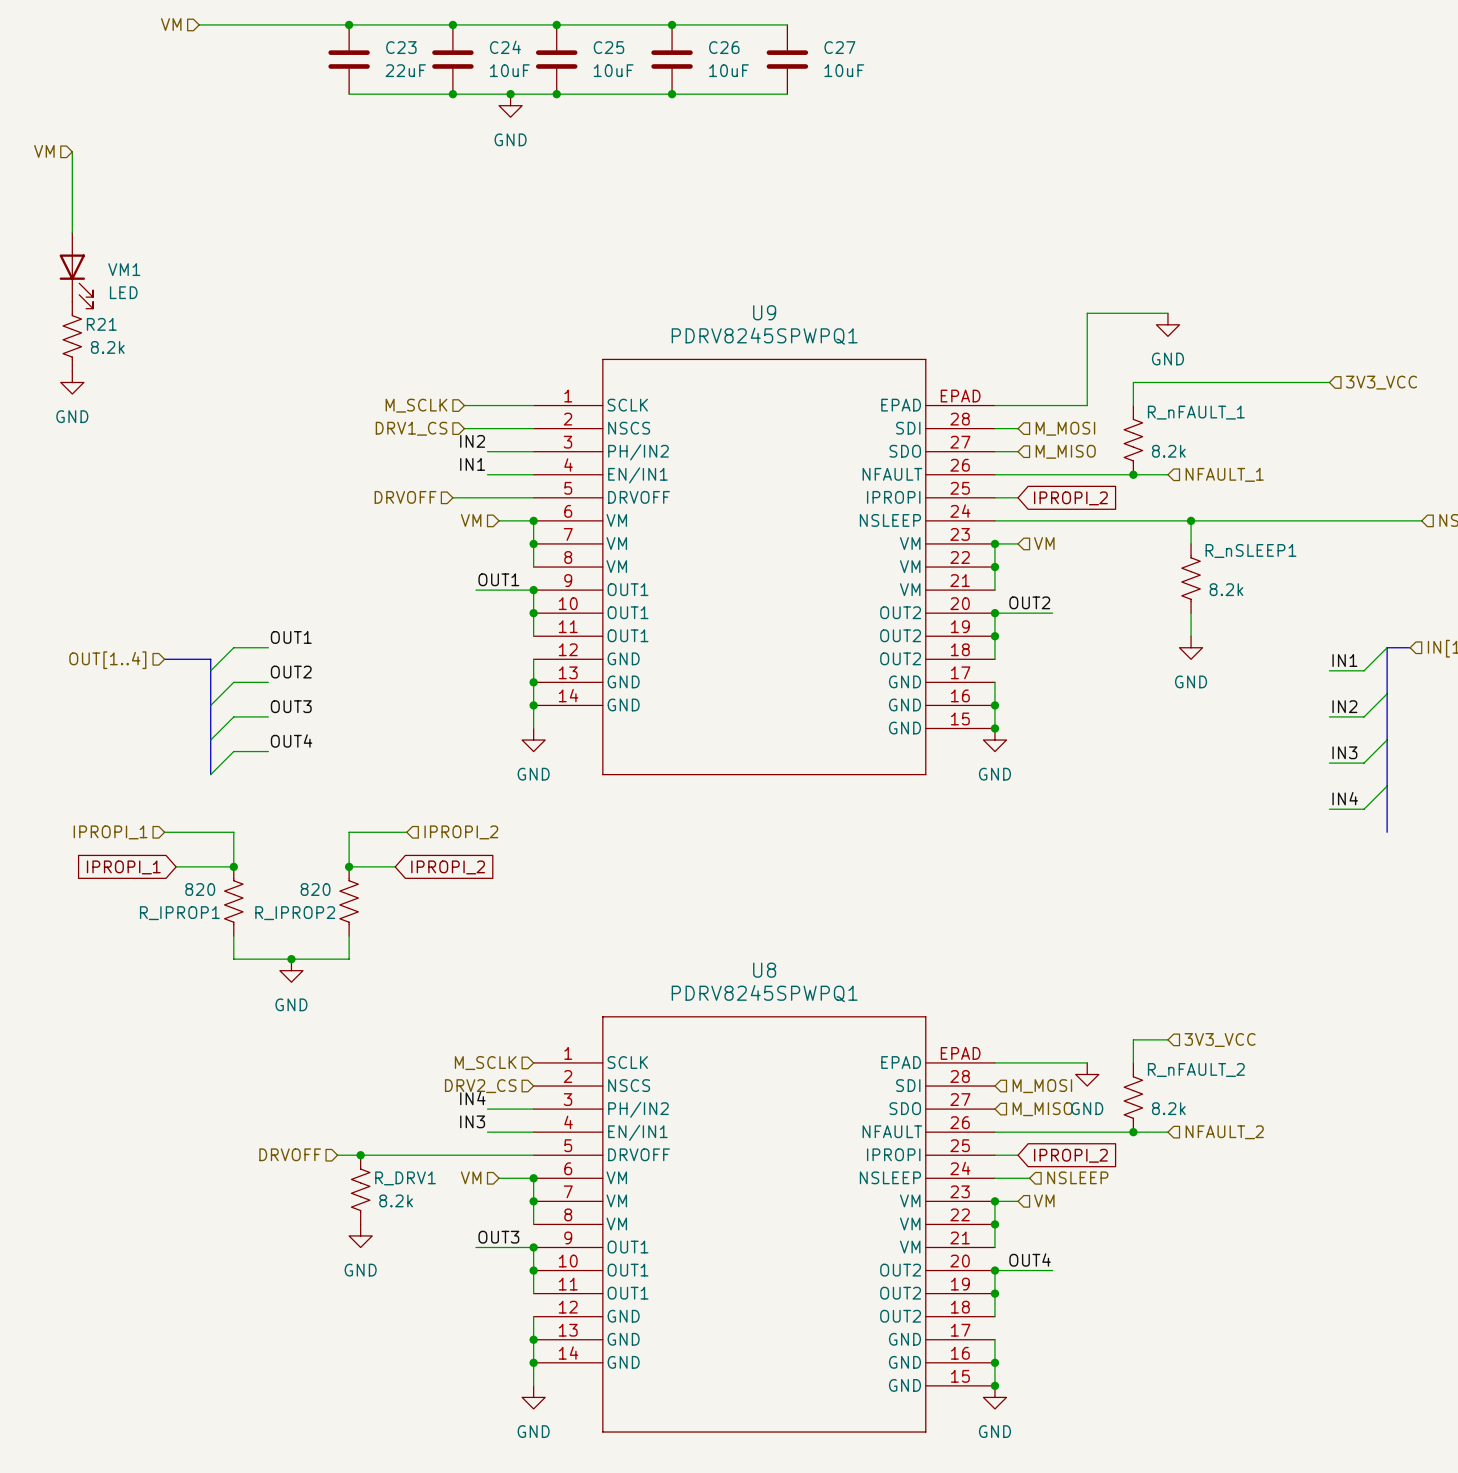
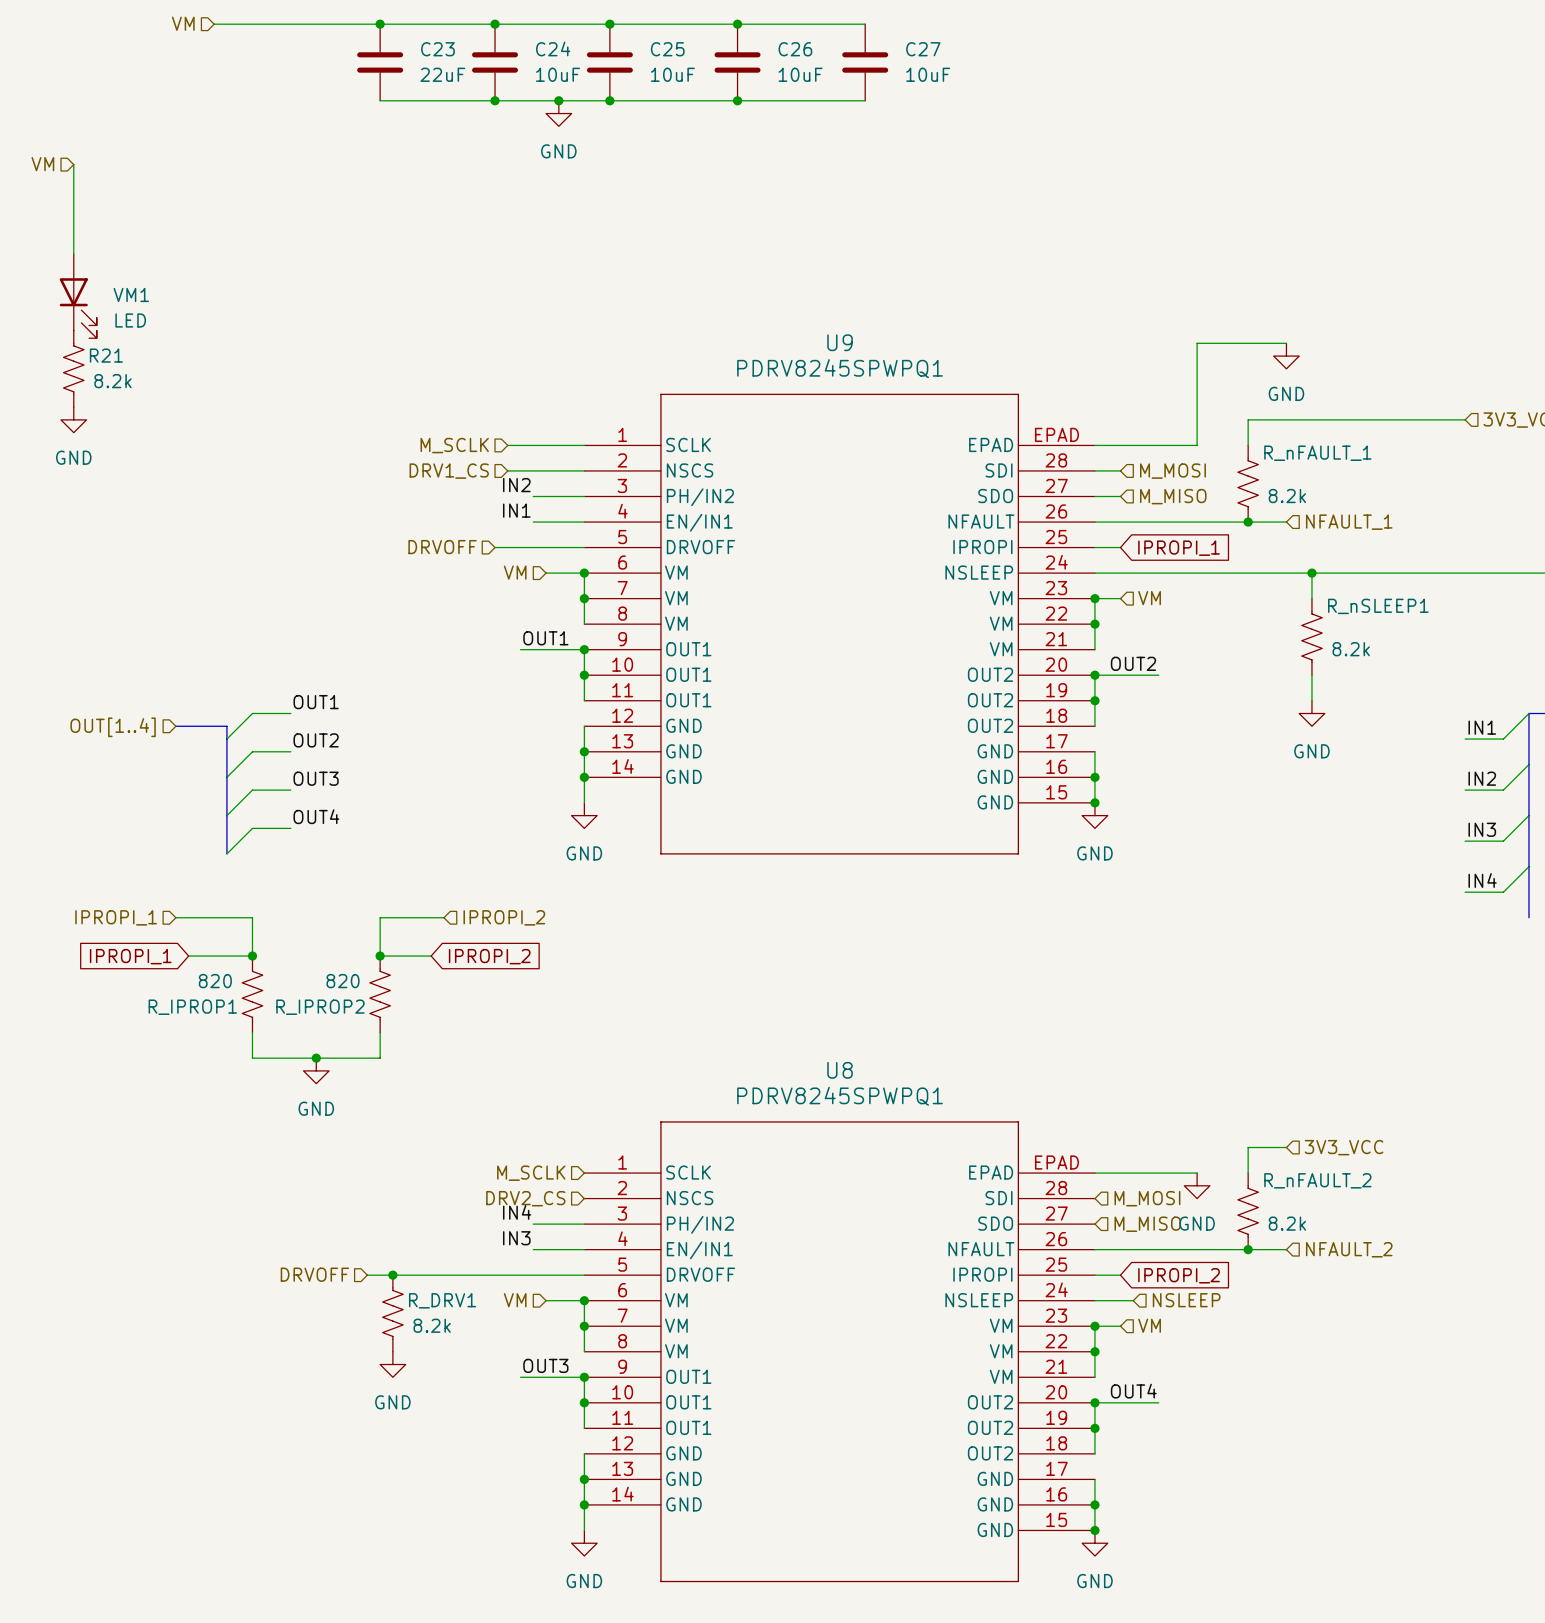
global label: IPROPI_2 (1070, 498) -> IPROPI_1 (1179, 548)

